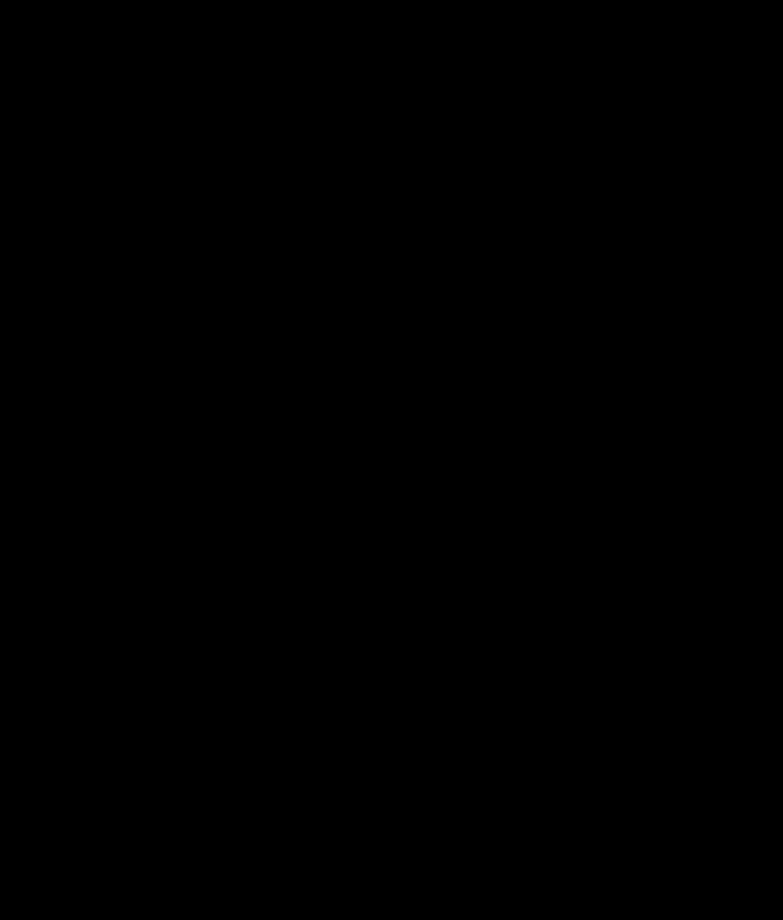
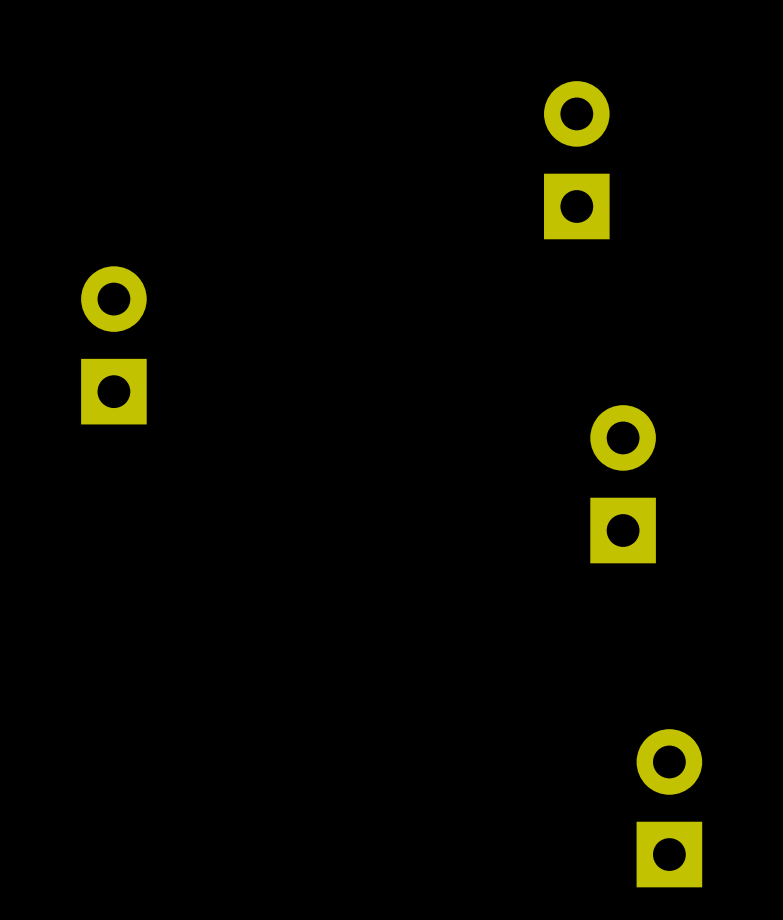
part: none -> (576, 160)
part: none -> (113, 345)
part: none -> (623, 484)
part: none -> (669, 808)

